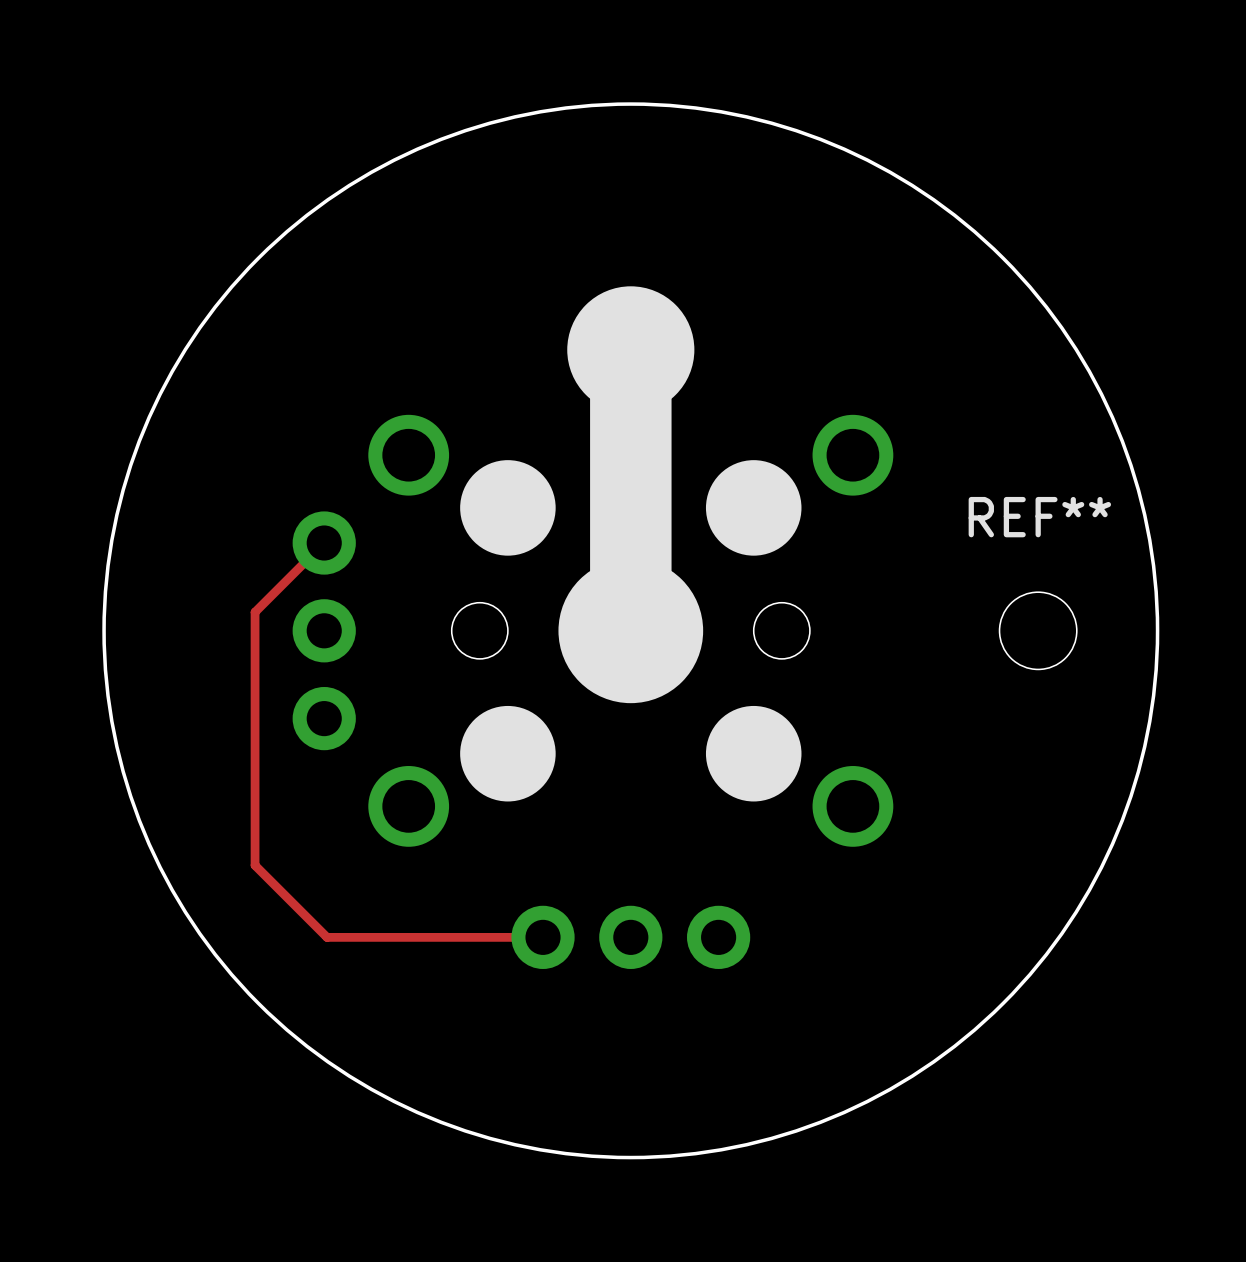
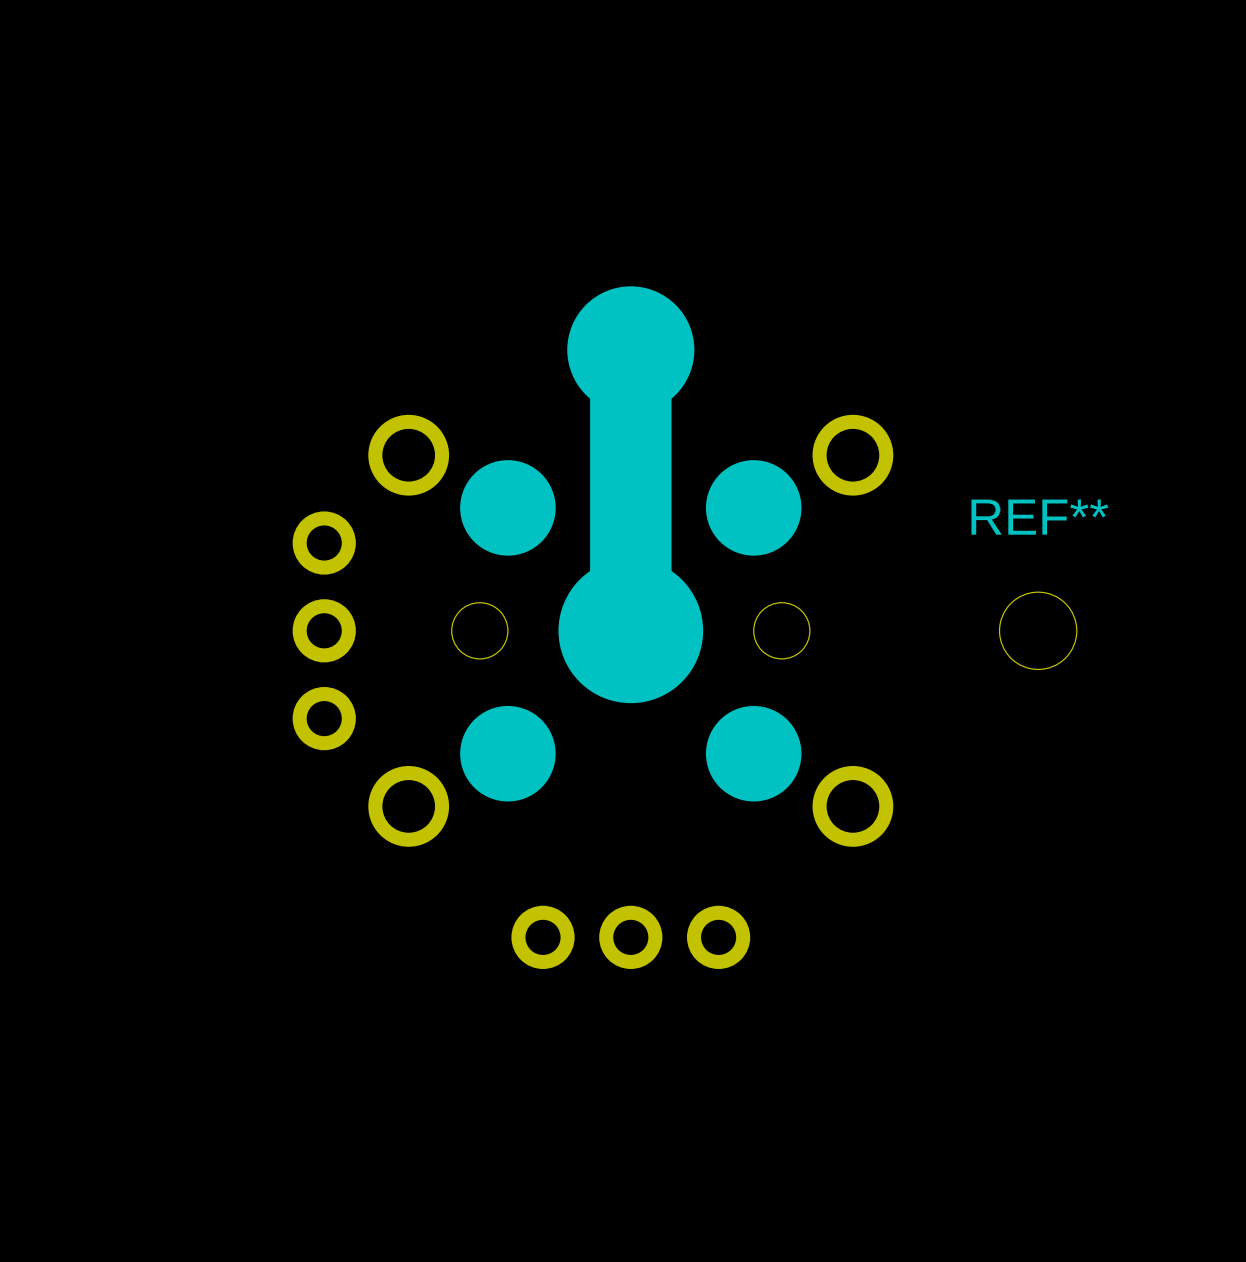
round board edge: [102, 102, 1160, 1160] -> none
track: (324, 543) (255, 612) (255, 865) (327, 937) (543, 937) -> none

